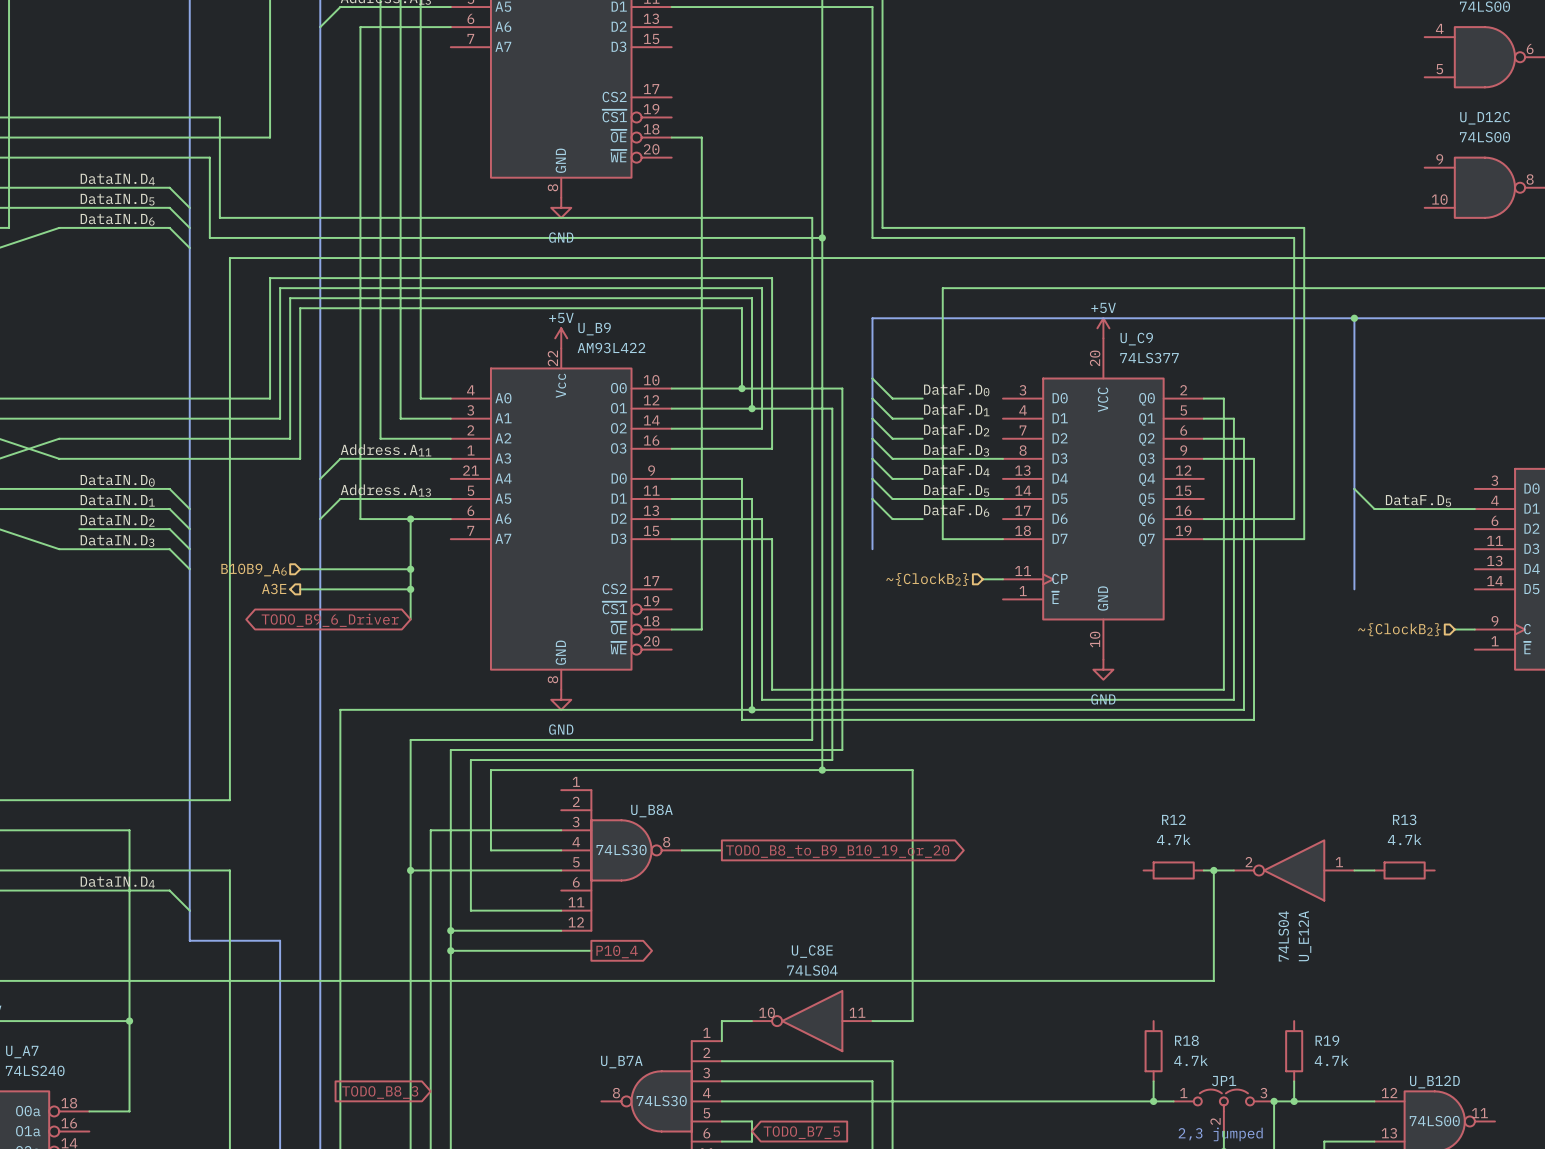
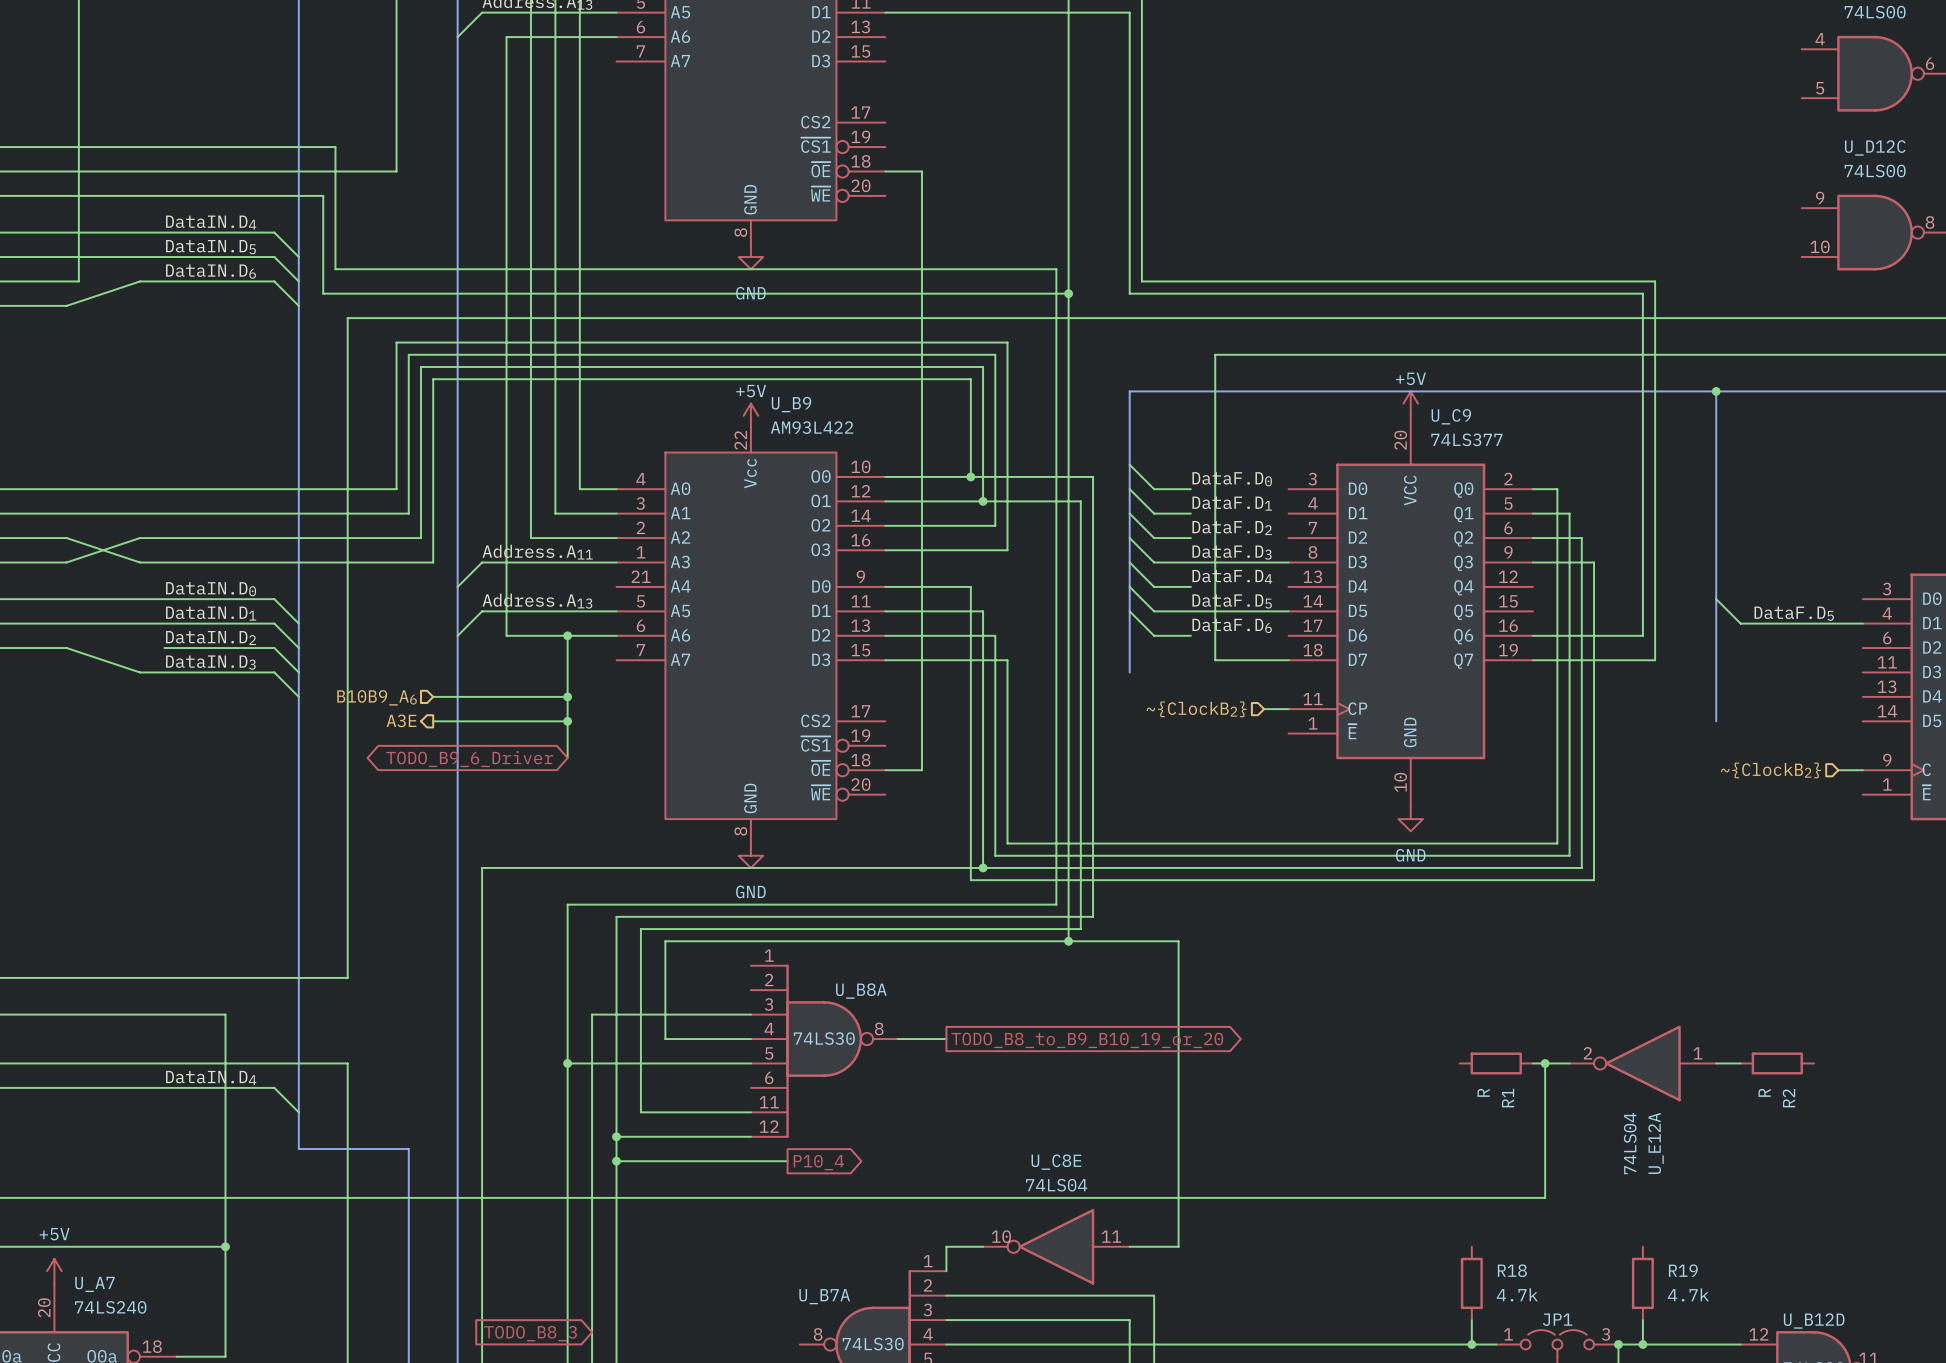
R12 name: R12 (1173, 819) -> R1 (1508, 1098)
R13 name: R13 (1404, 819) -> R2 (1788, 1098)
R12 value: 4.7k (1173, 839) -> R (1483, 1092)
R13 value: 4.7k (1404, 839) -> R (1764, 1092)

